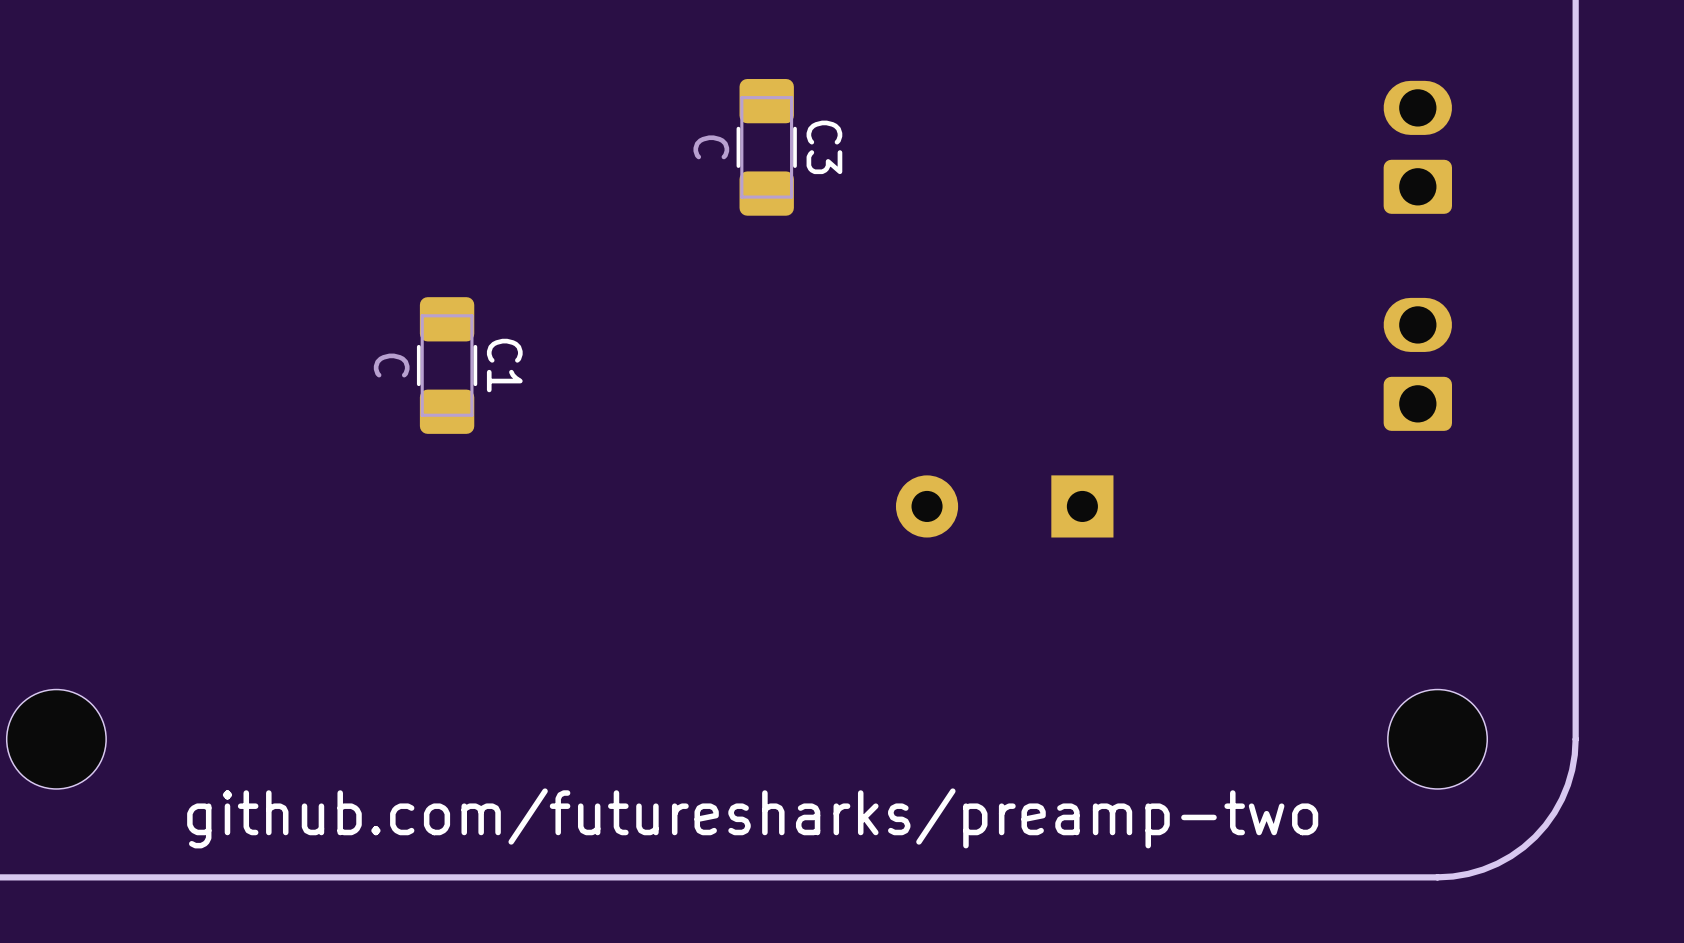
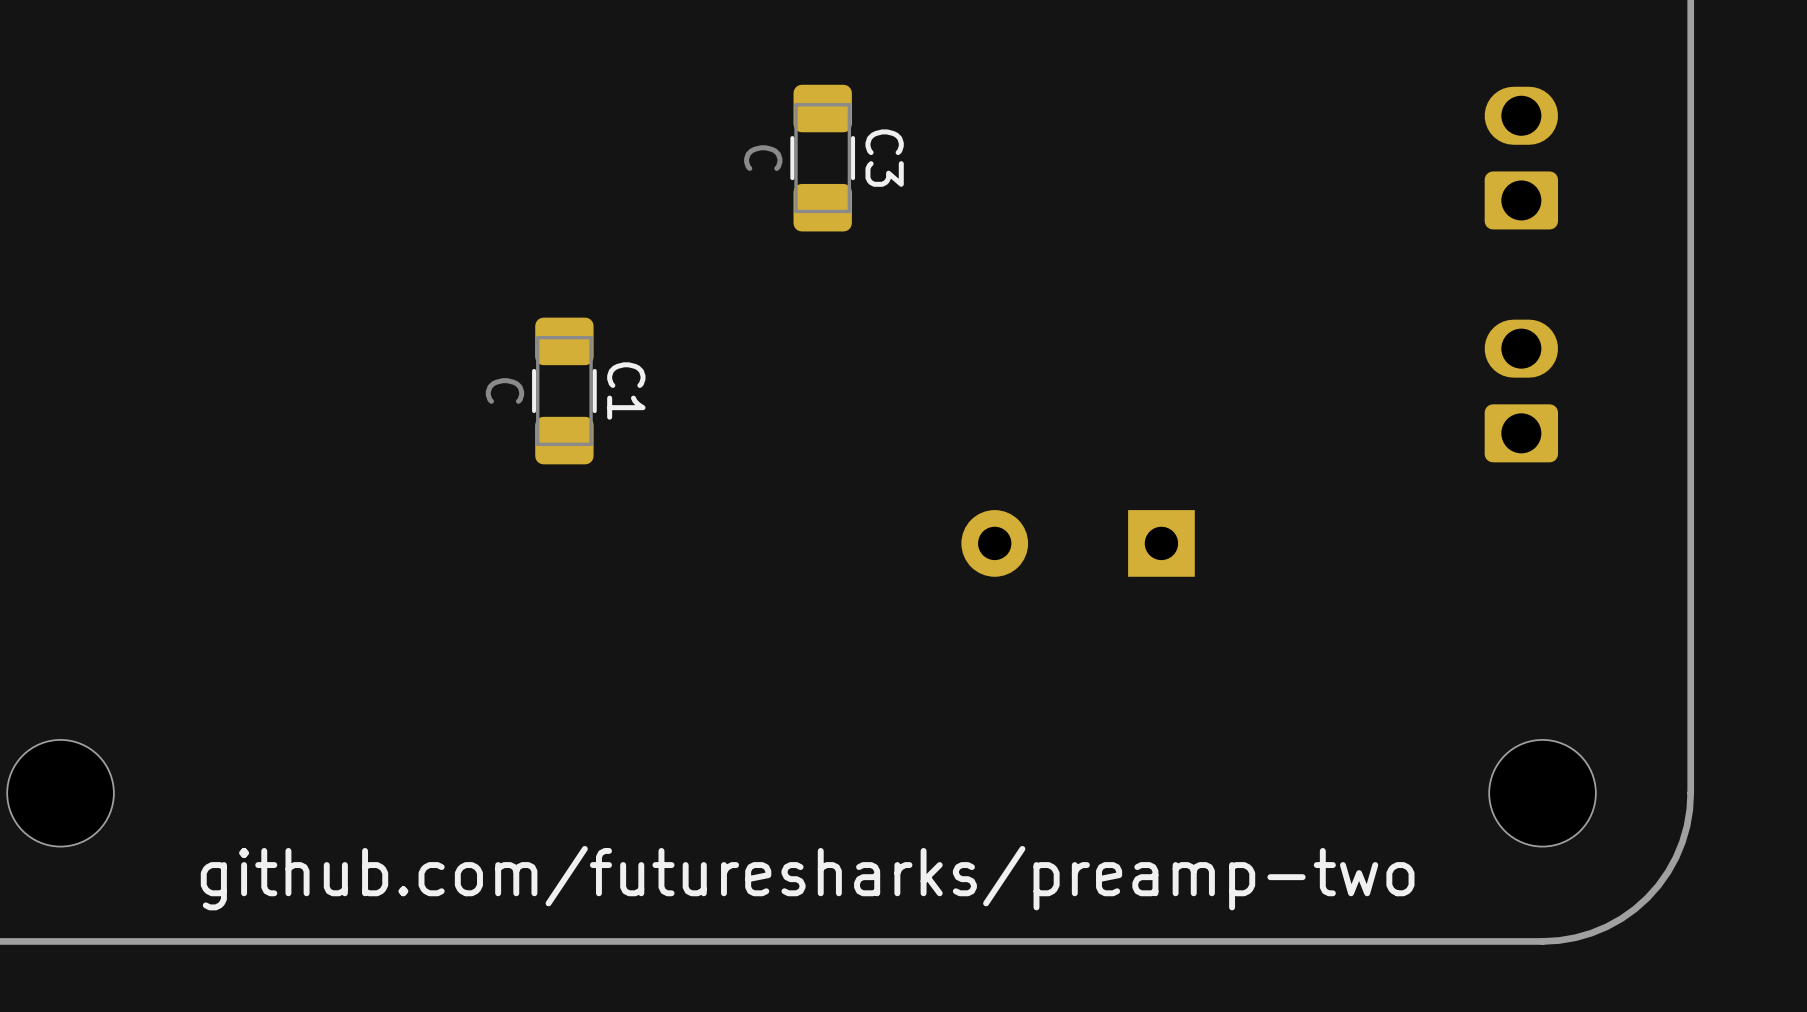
C1 position: (447, 365) -> (564, 390)

